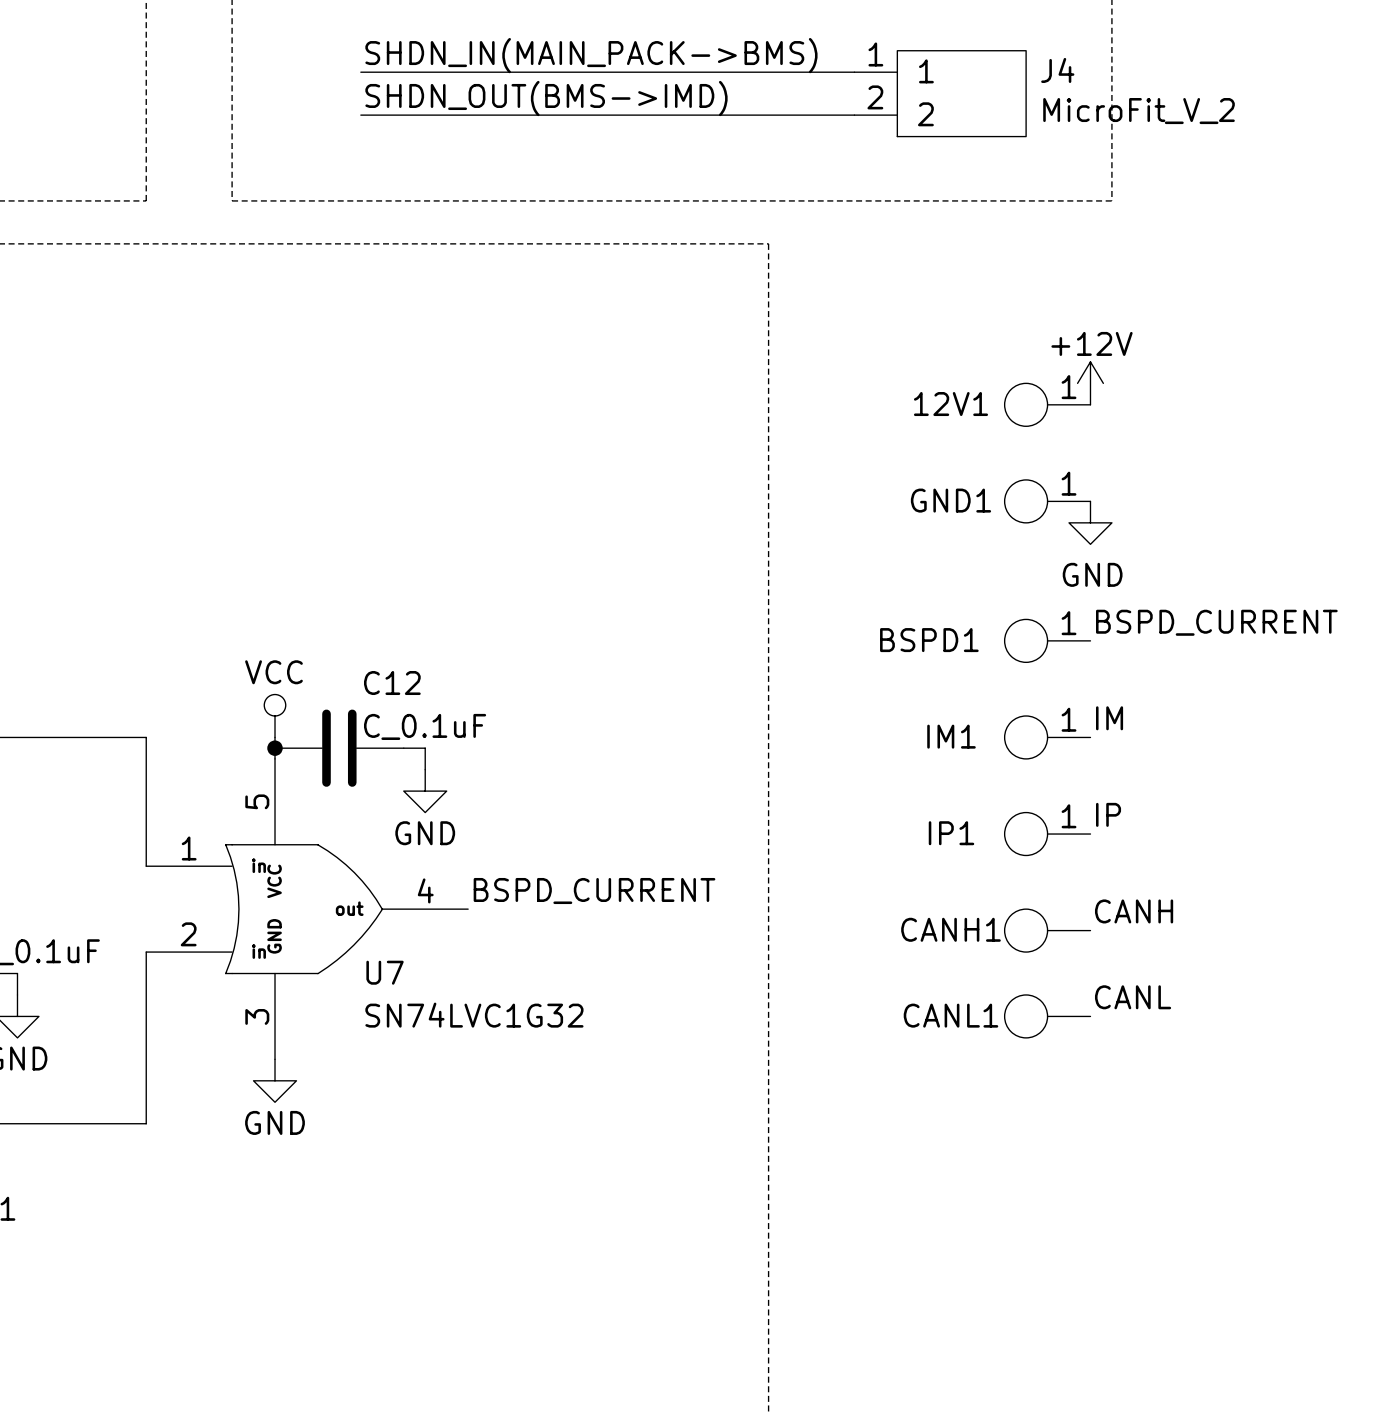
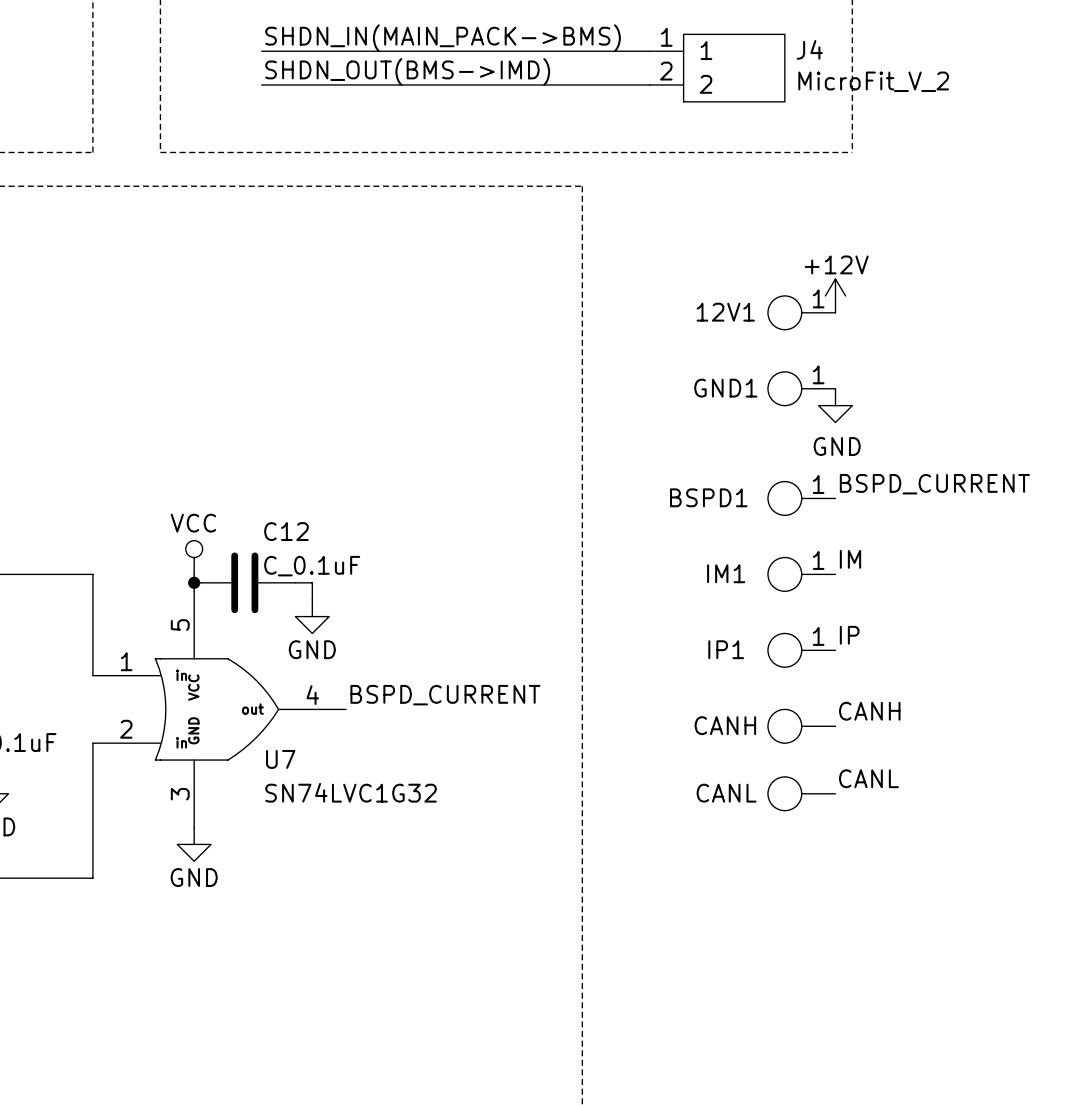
CANH1 name: CANH1 (950, 929) -> CANH (725, 725)
CANL1 name: CANL1 (950, 1015) -> CANL (726, 793)

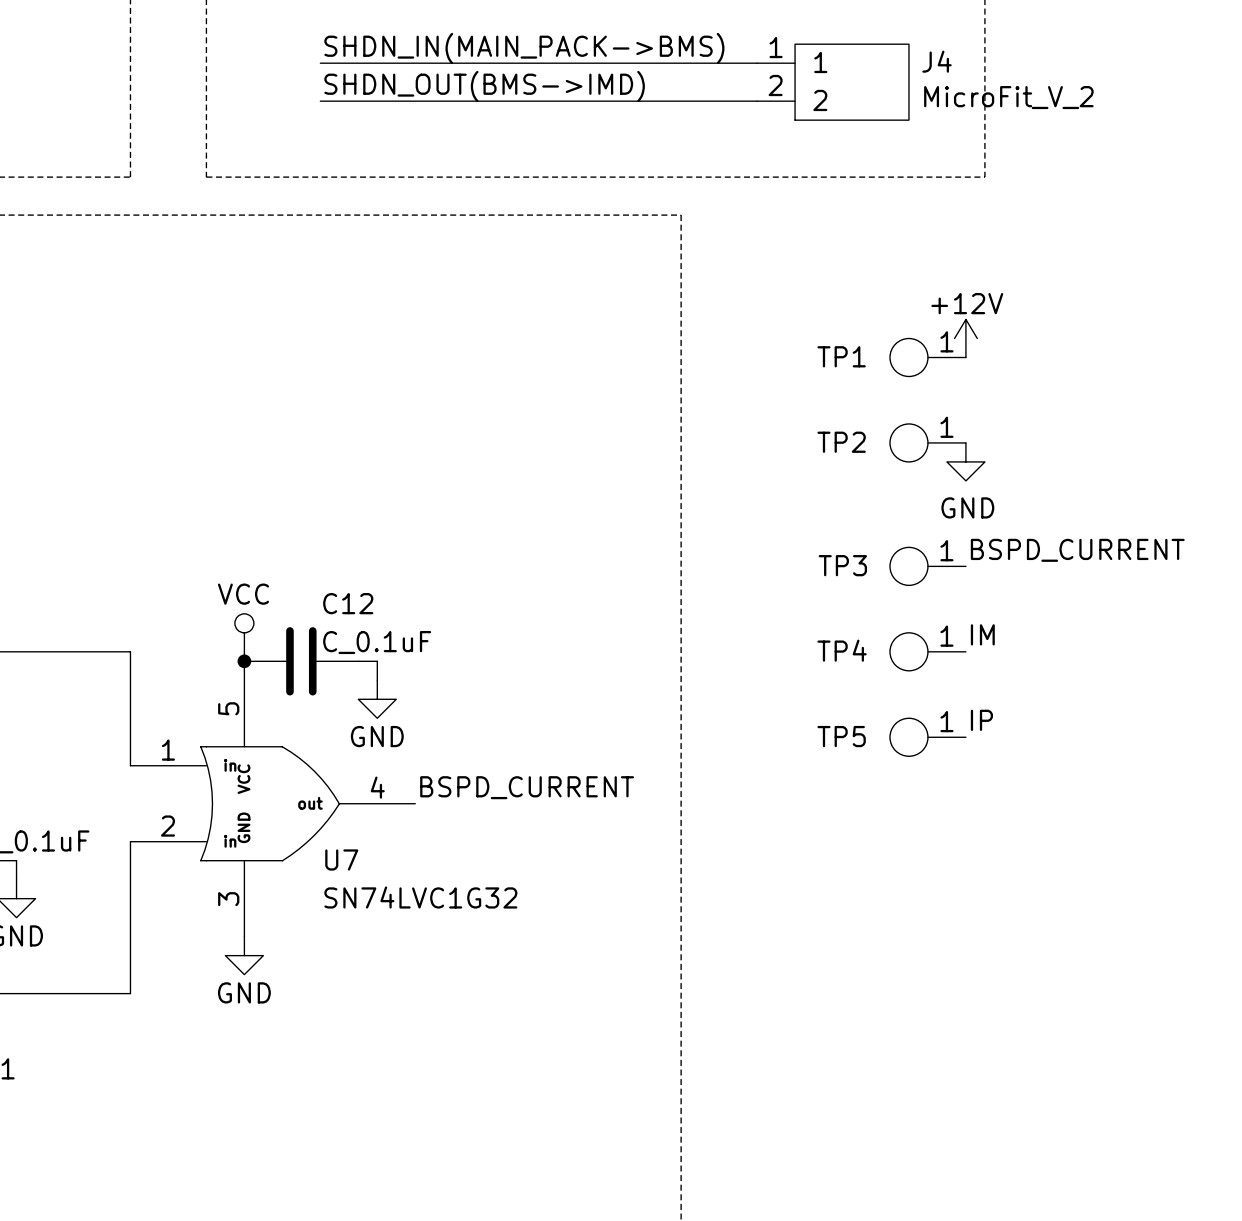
12V1 name: 12V1 (725, 312) -> TP1 (841, 356)
GND1 name: GND1 (725, 388) -> TP2 (841, 442)
BSPD1 name: BSPD1 (708, 497) -> TP3 (842, 565)
IM1 name: IM1 (726, 573) -> TP4 (842, 650)
IP1 name: IP1 (726, 649) -> TP5 (841, 736)
label: CANH (869, 711) -> none
CANH: (801, 726) -> none
label: CANL (868, 778) -> none
CANL: (801, 793) -> none

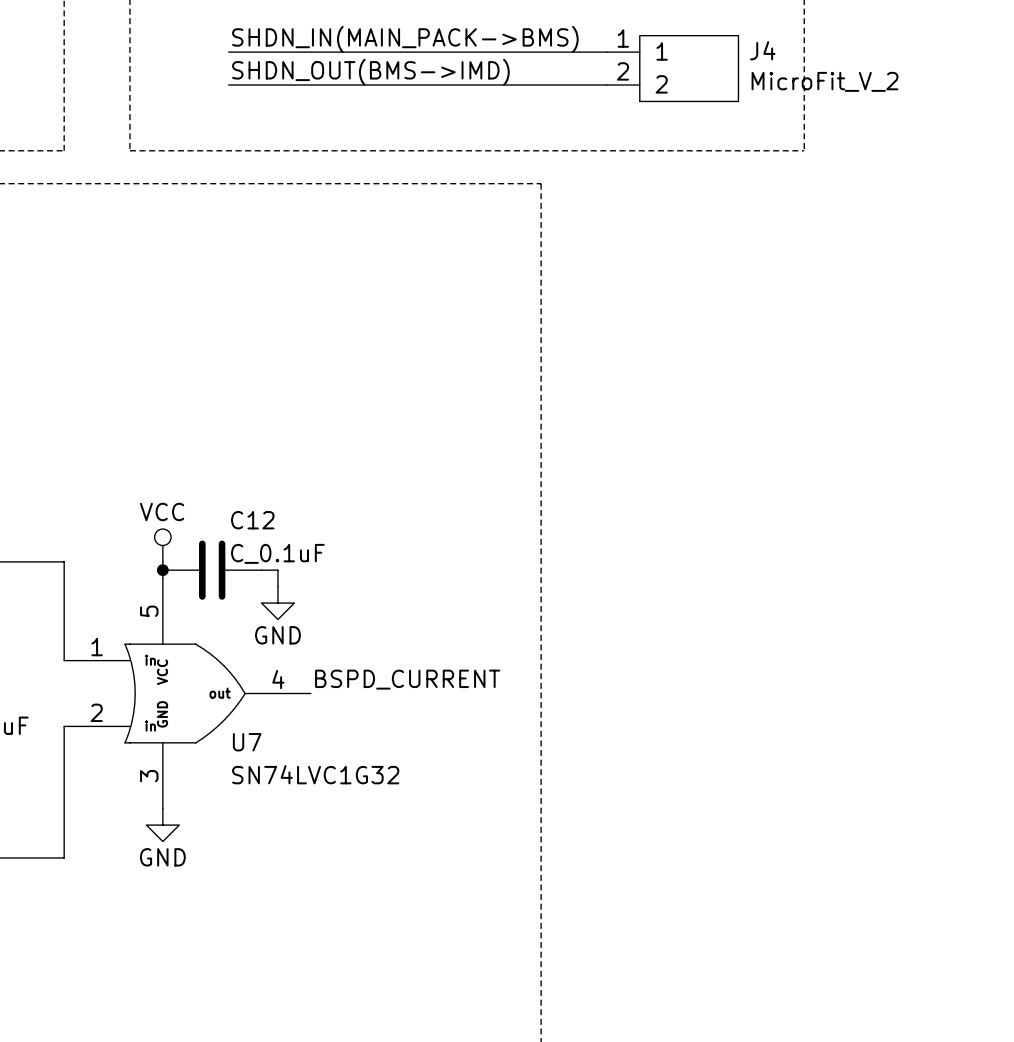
power symbol: +12V (965, 338) -> none
TP1: (927, 357) -> none
TP2: (927, 442) -> none
power symbol: GND (965, 461) -> none
label: BSPD_CURRENT (1077, 550) -> none
TP3: (927, 566) -> none
label: IM (982, 634) -> none
TP4: (927, 651) -> none
label: IP (981, 720) -> none
TP5: (927, 737) -> none

